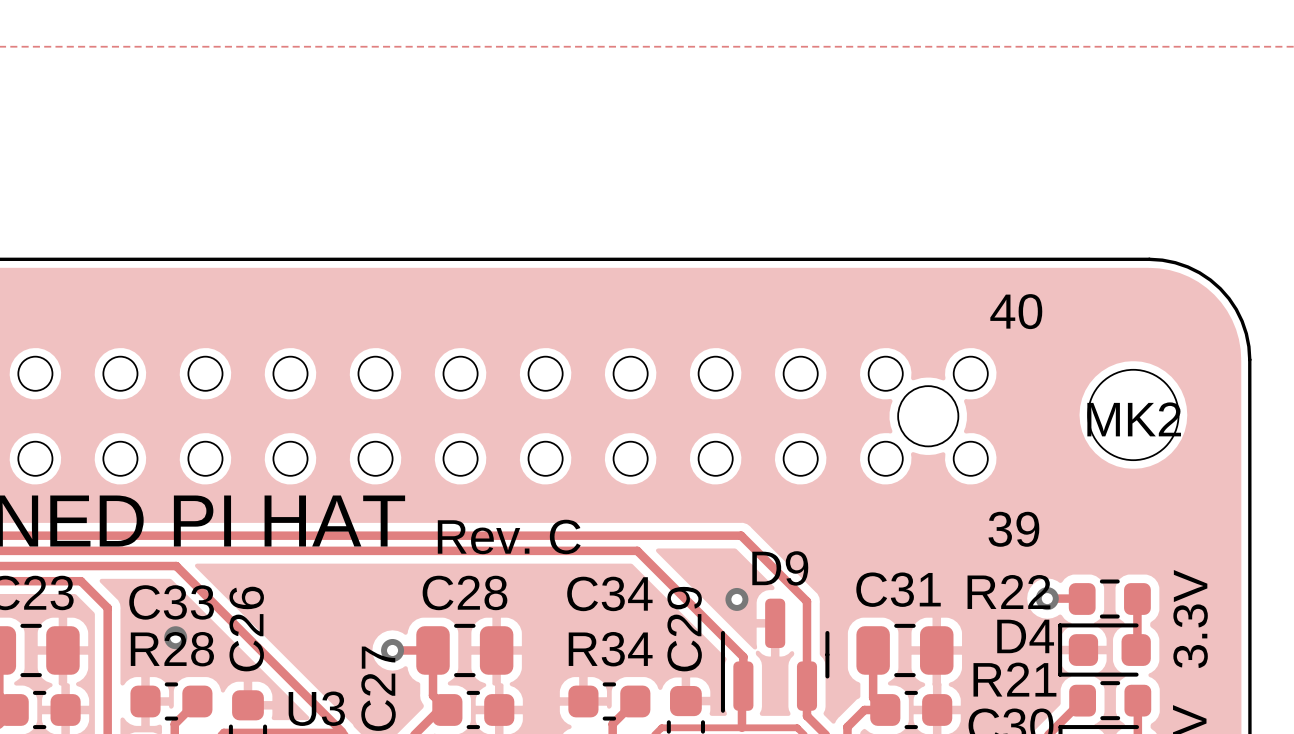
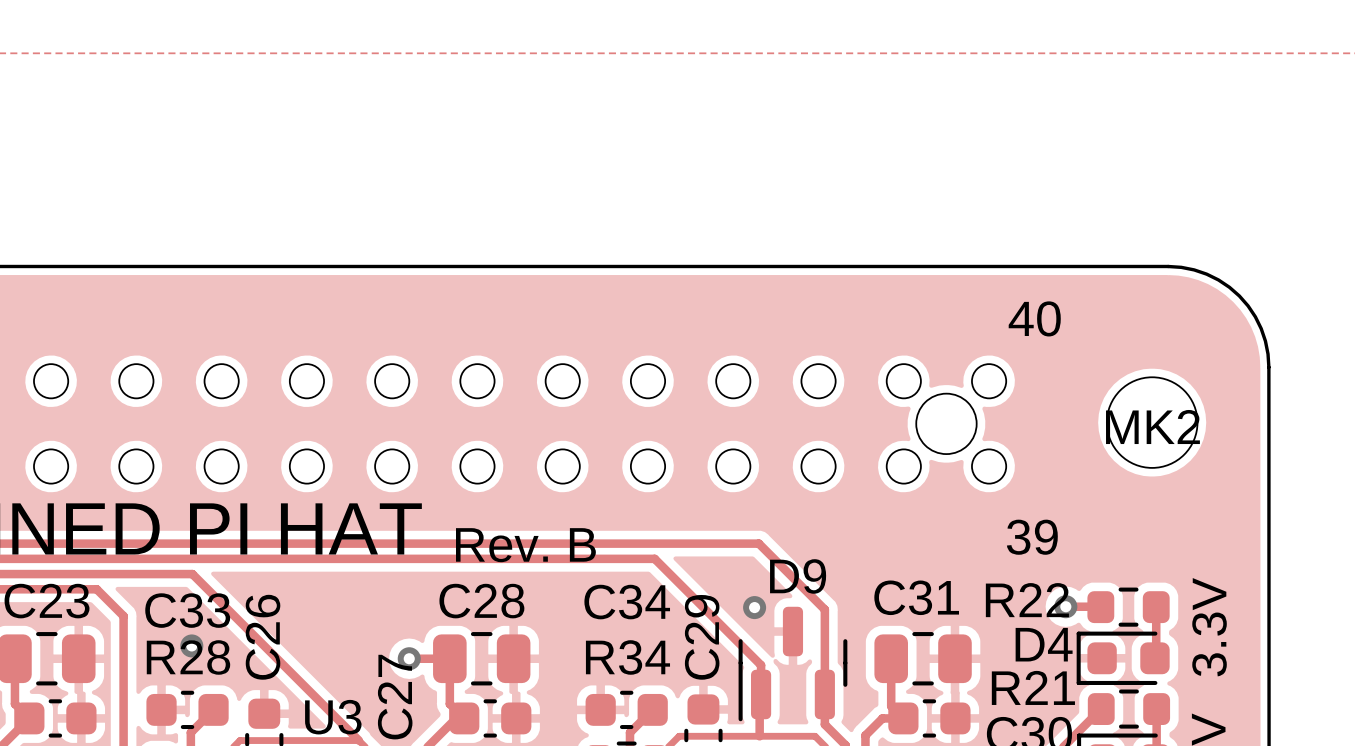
text: Rev. C (509, 536) -> Rev. B (525, 545)

